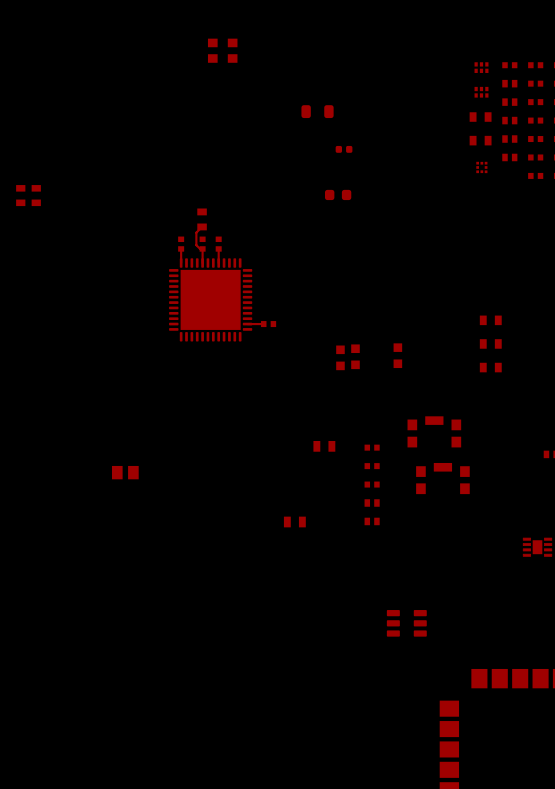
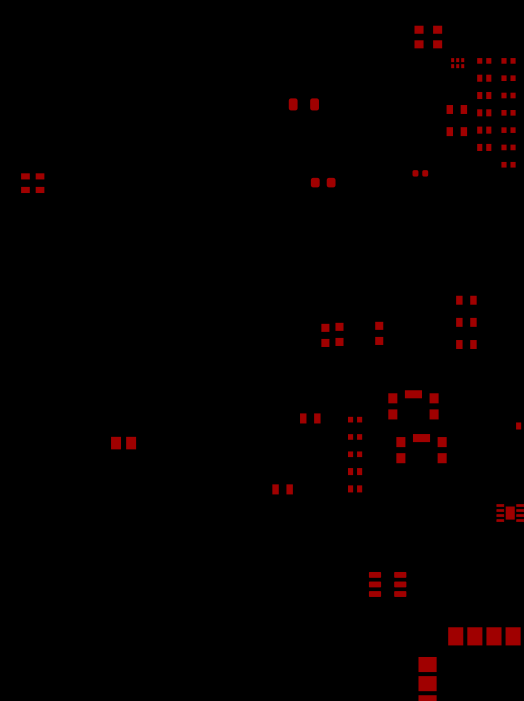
part position: (222, 50) -> (428, 37)
part: (481, 92) -> none
part position: (344, 149) -> (420, 173)
part: (481, 167) -> none
part: (202, 219) -> none
top track: (202, 226) (196, 232) (196, 245) (202, 248) (202, 263) -> none
part: (181, 244) -> none
part: (202, 244) -> none
part: (218, 244) -> none
top track: (181, 248) (181, 263) -> none
top track: (218, 248) (218, 263) -> none
part: (210, 299) -> none
top track: (263, 324) (247, 324) -> none
part: (268, 324) -> none

